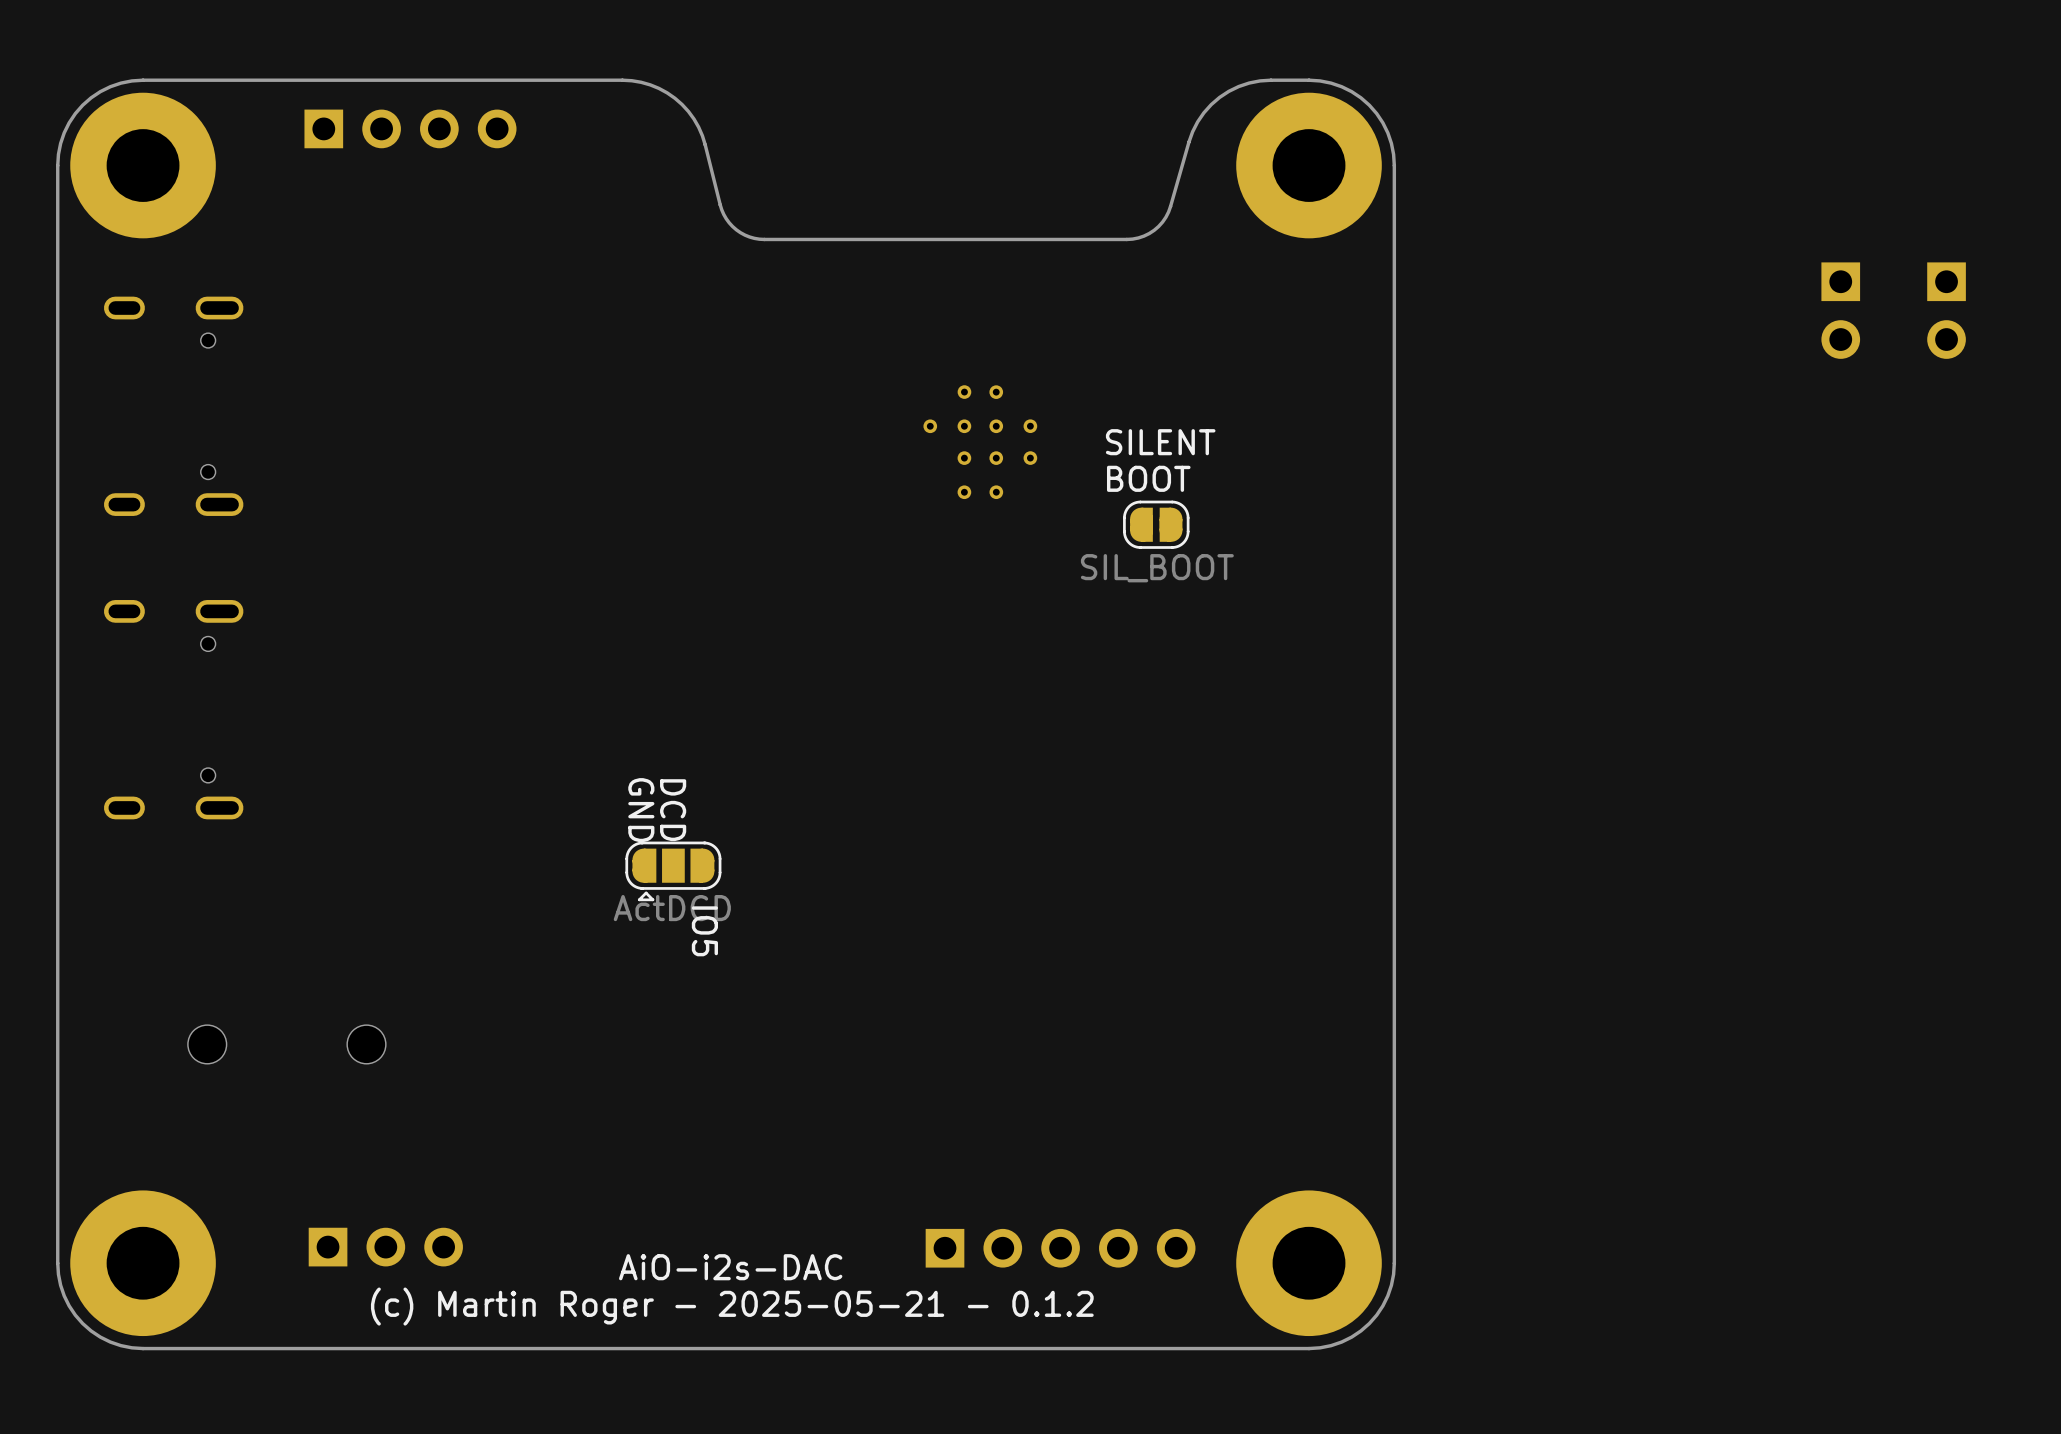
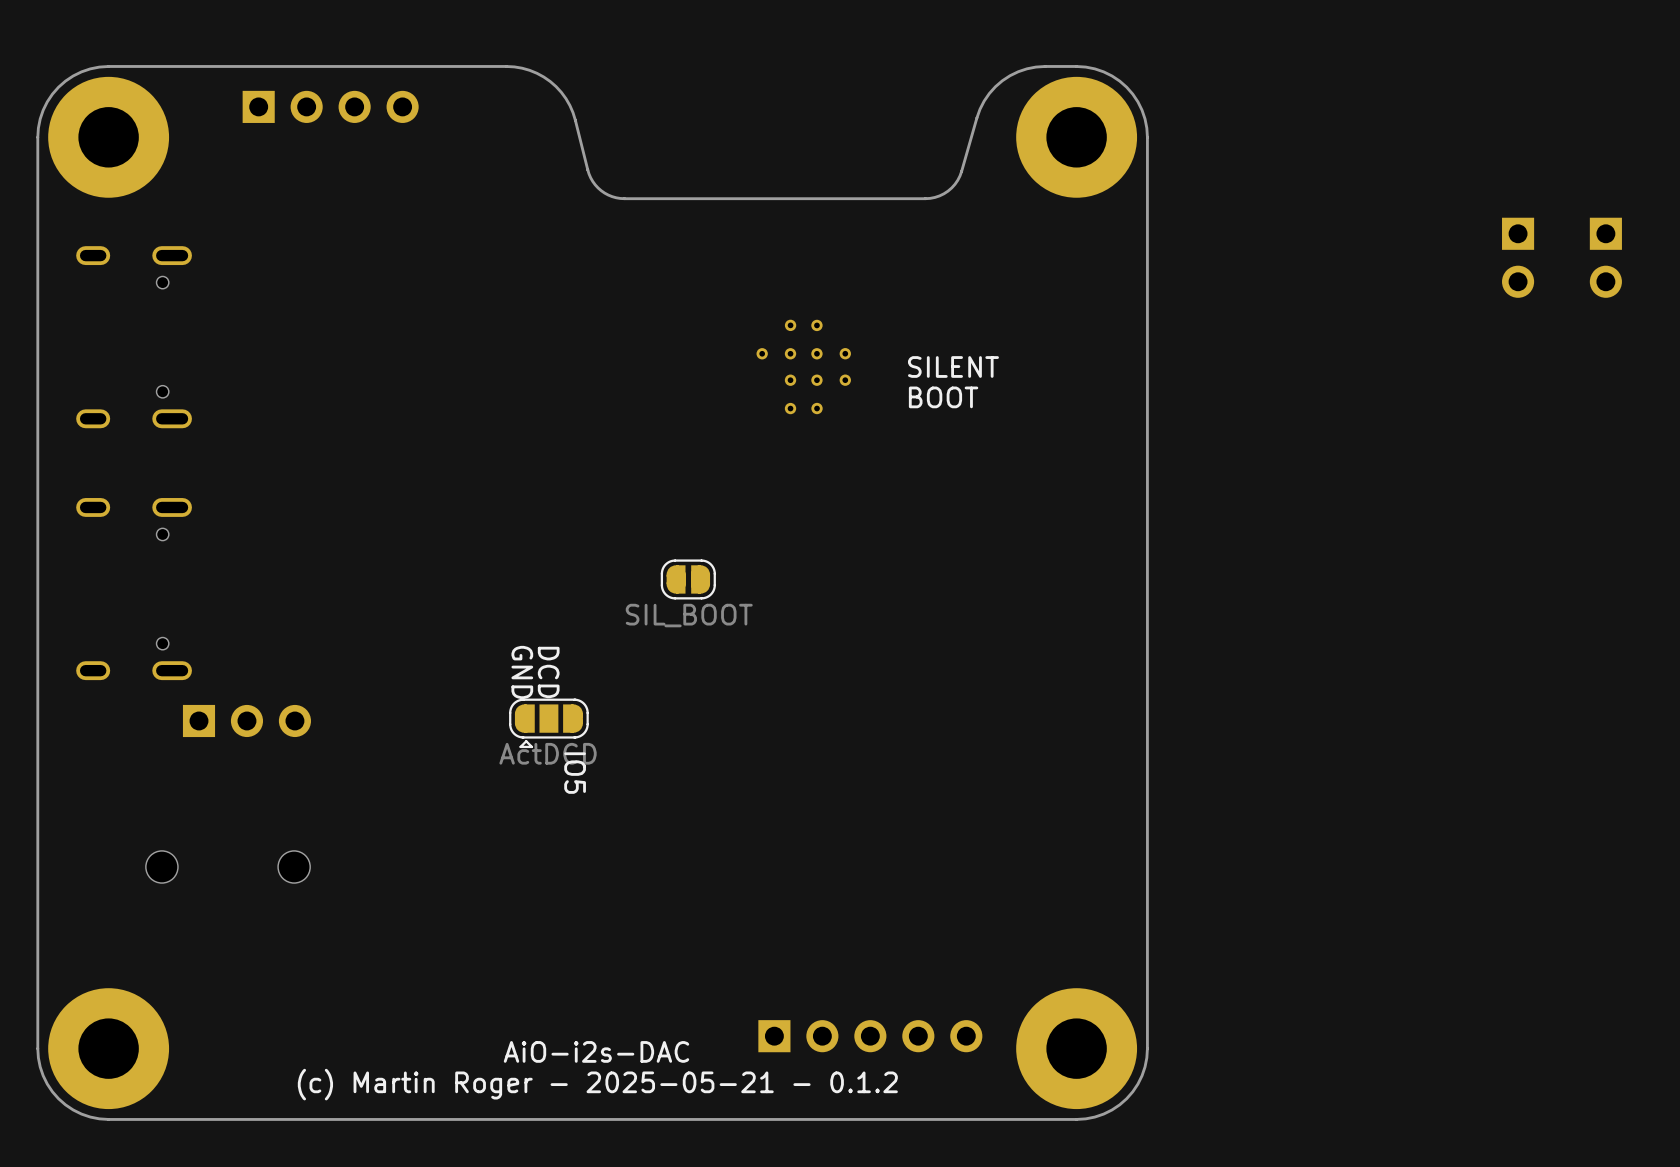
part position: (1156, 524) -> (688, 579)
part position: (385, 1247) -> (246, 720)

